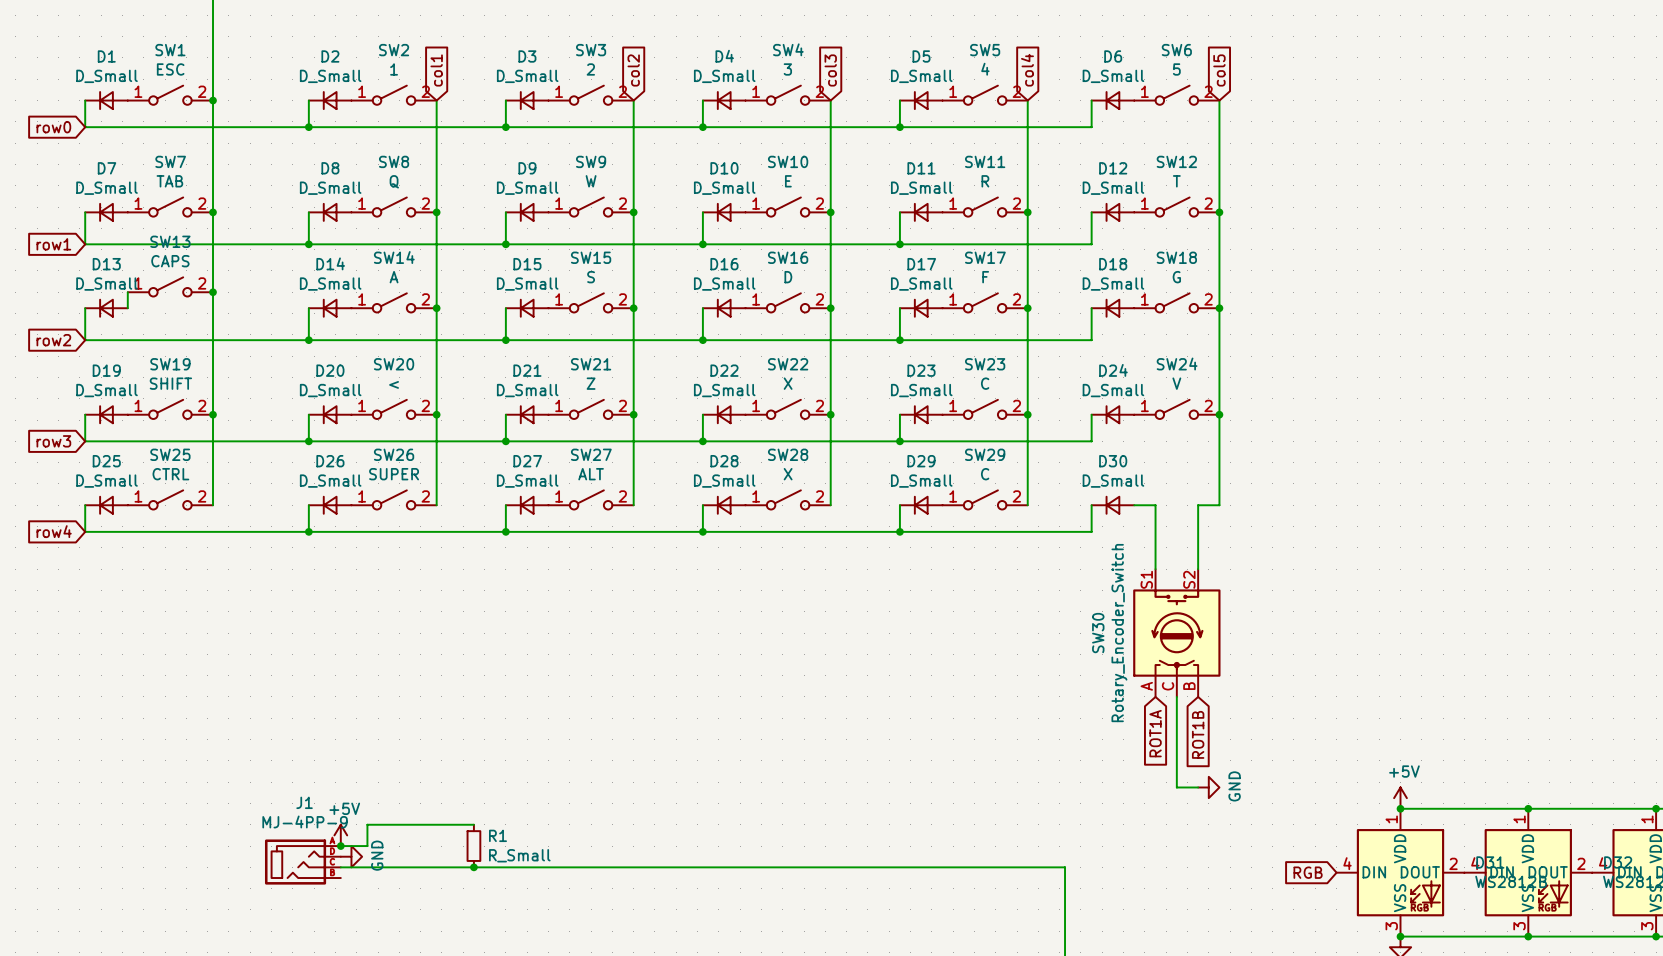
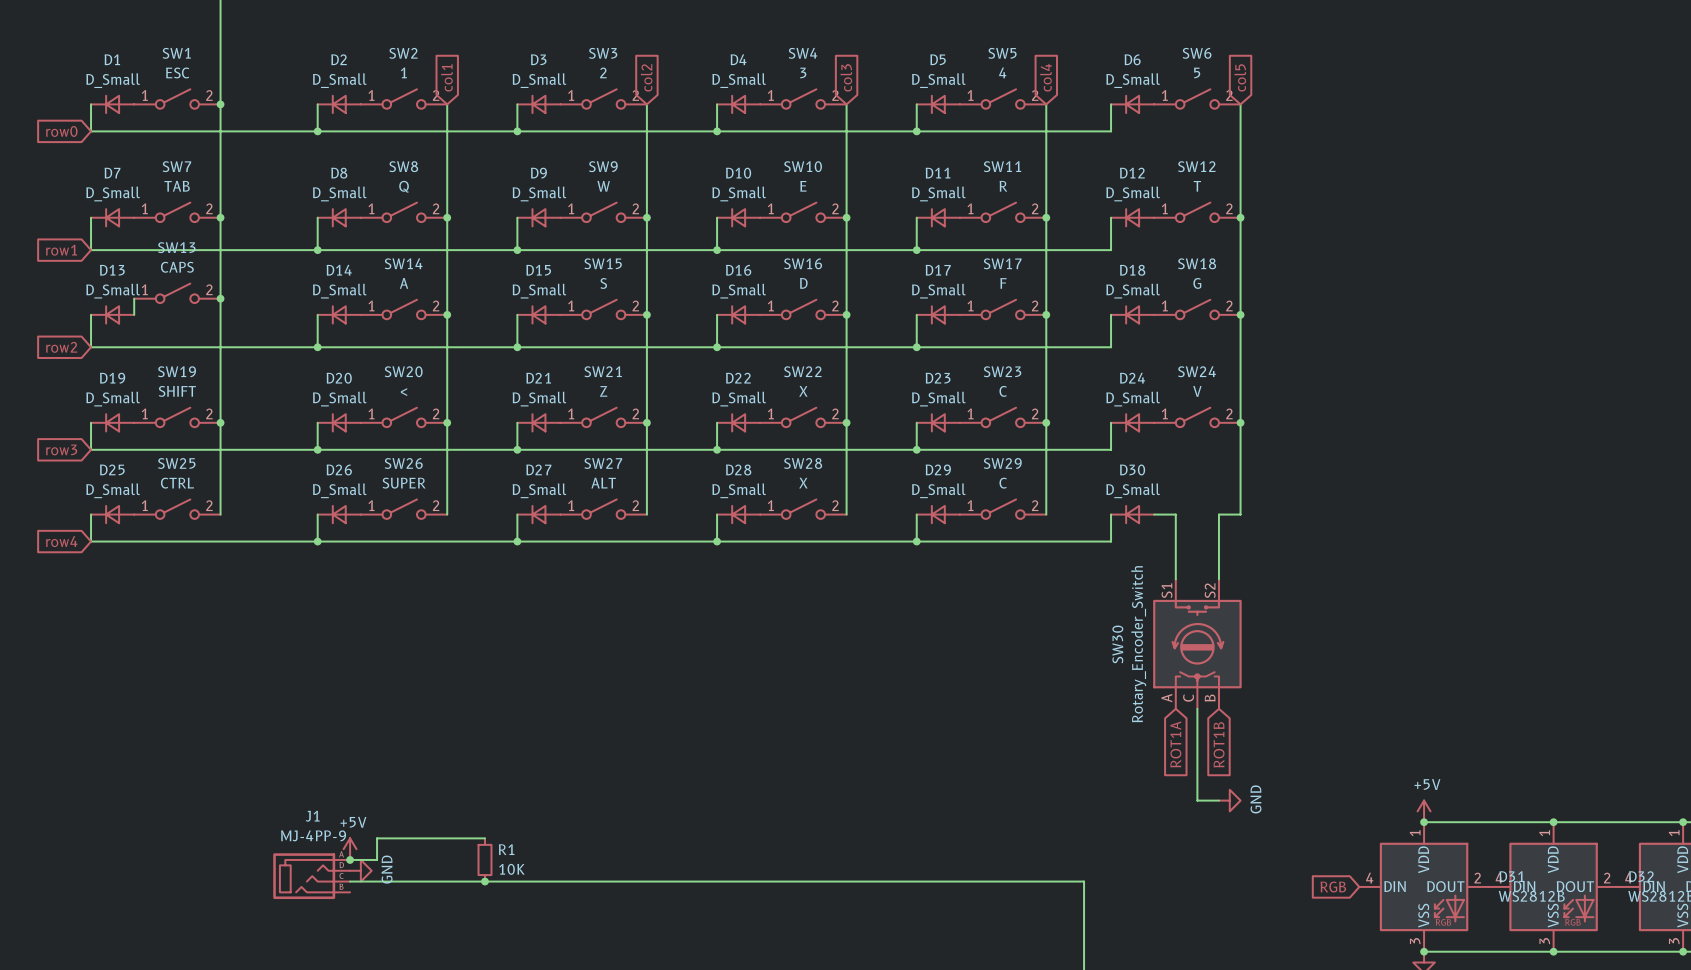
R1 value: R_Small (519, 855) -> 10K (511, 869)

